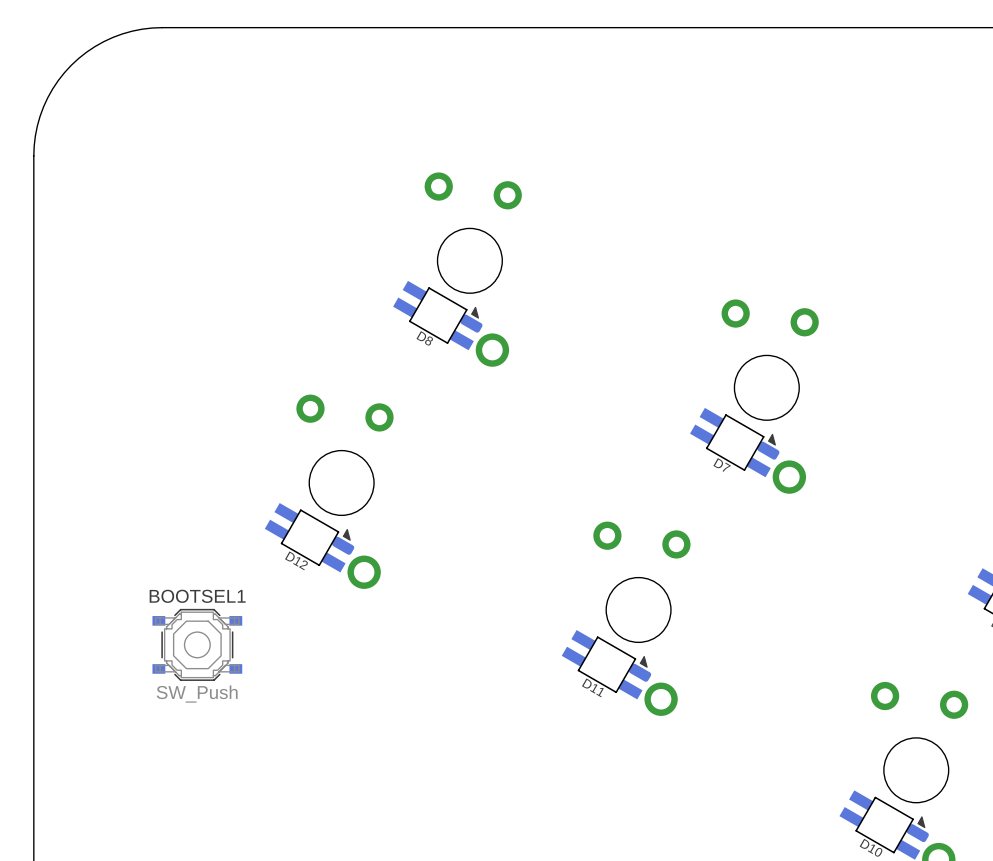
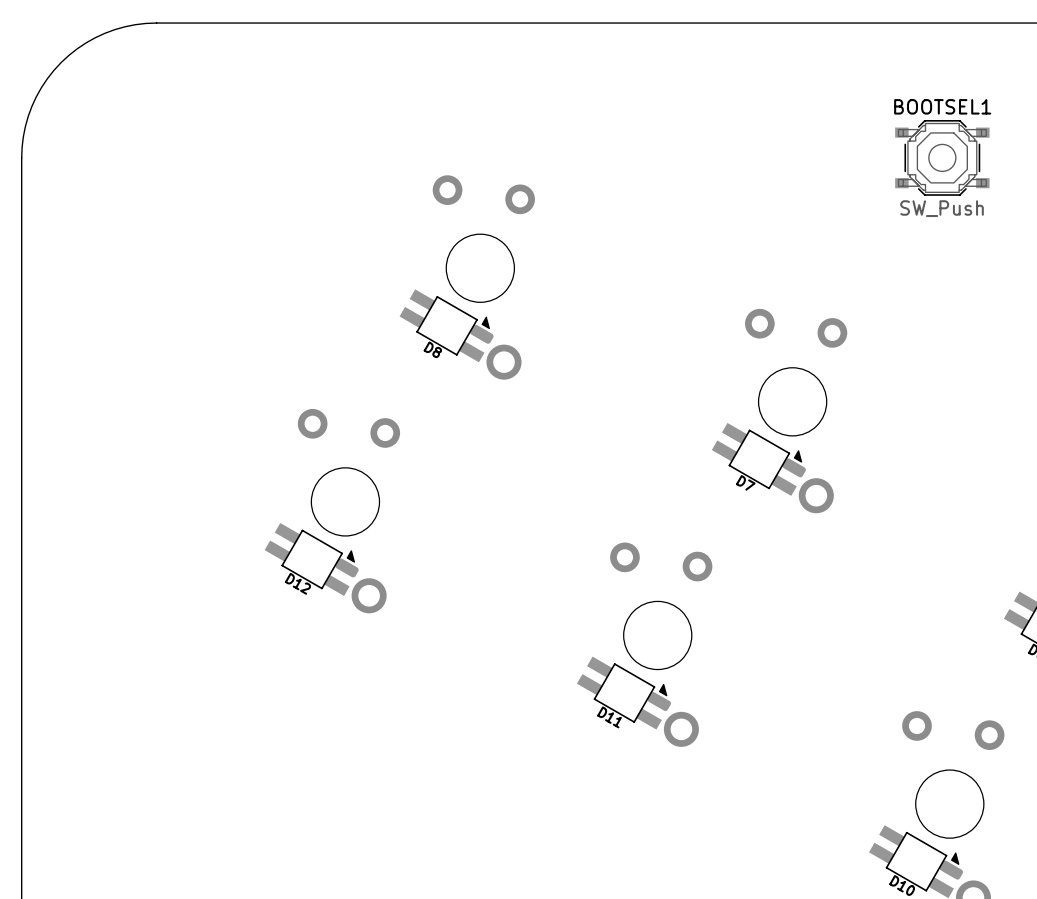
BOOTSEL1 position: (197, 644) -> (942, 157)

